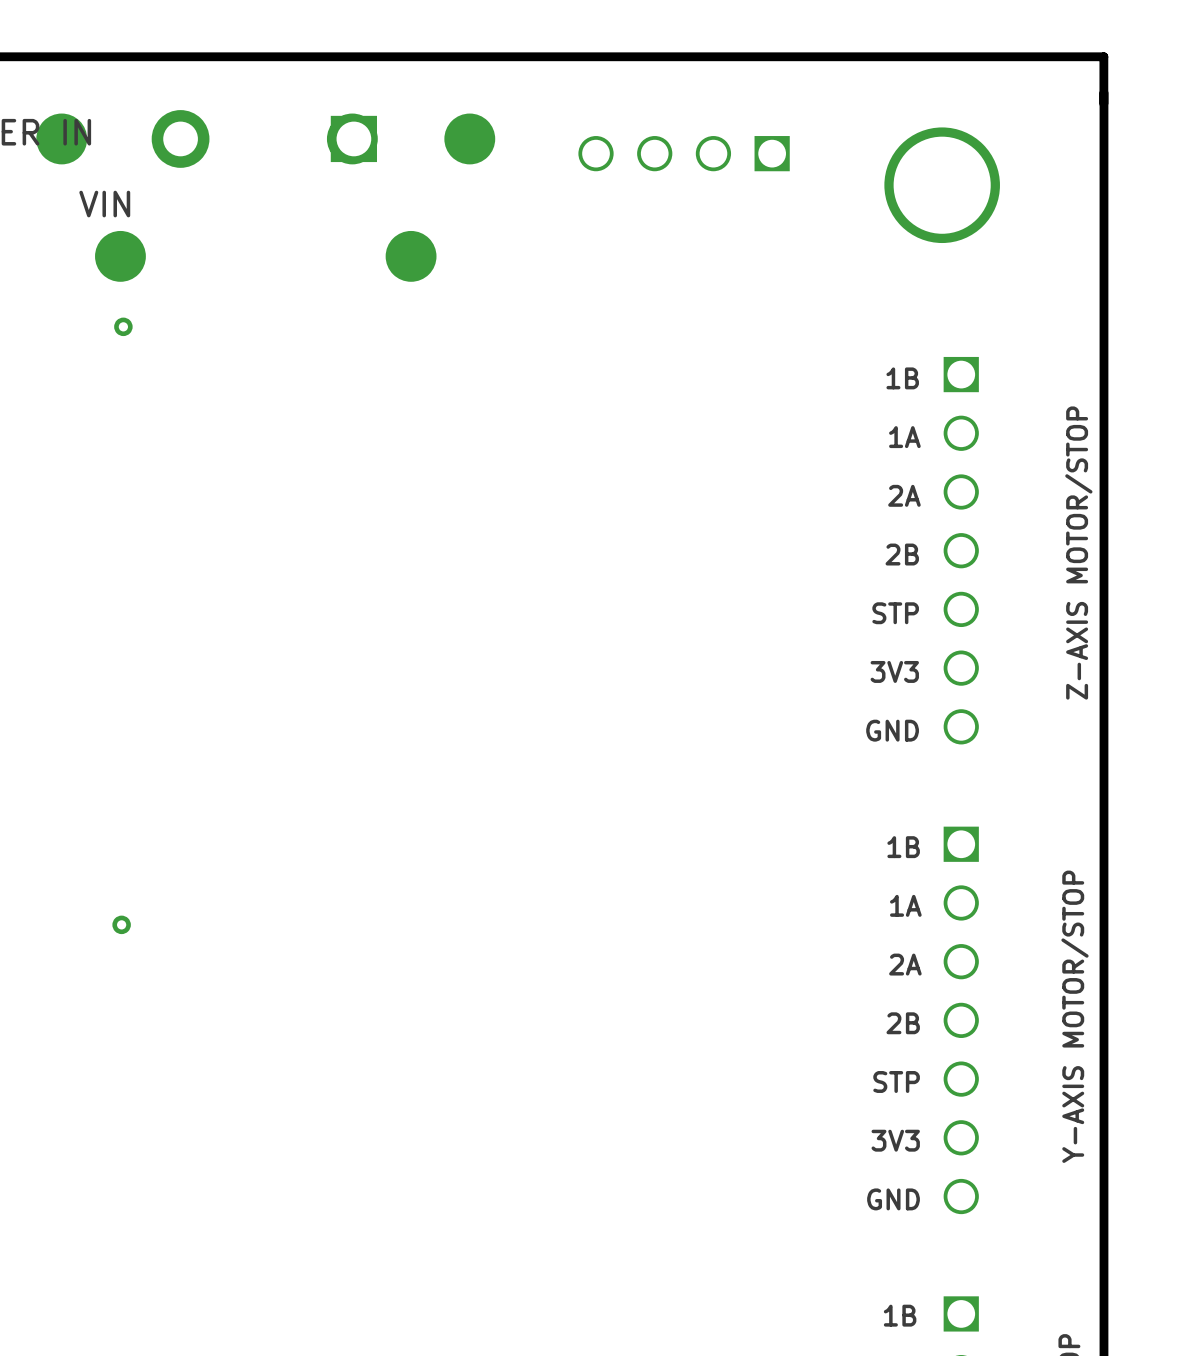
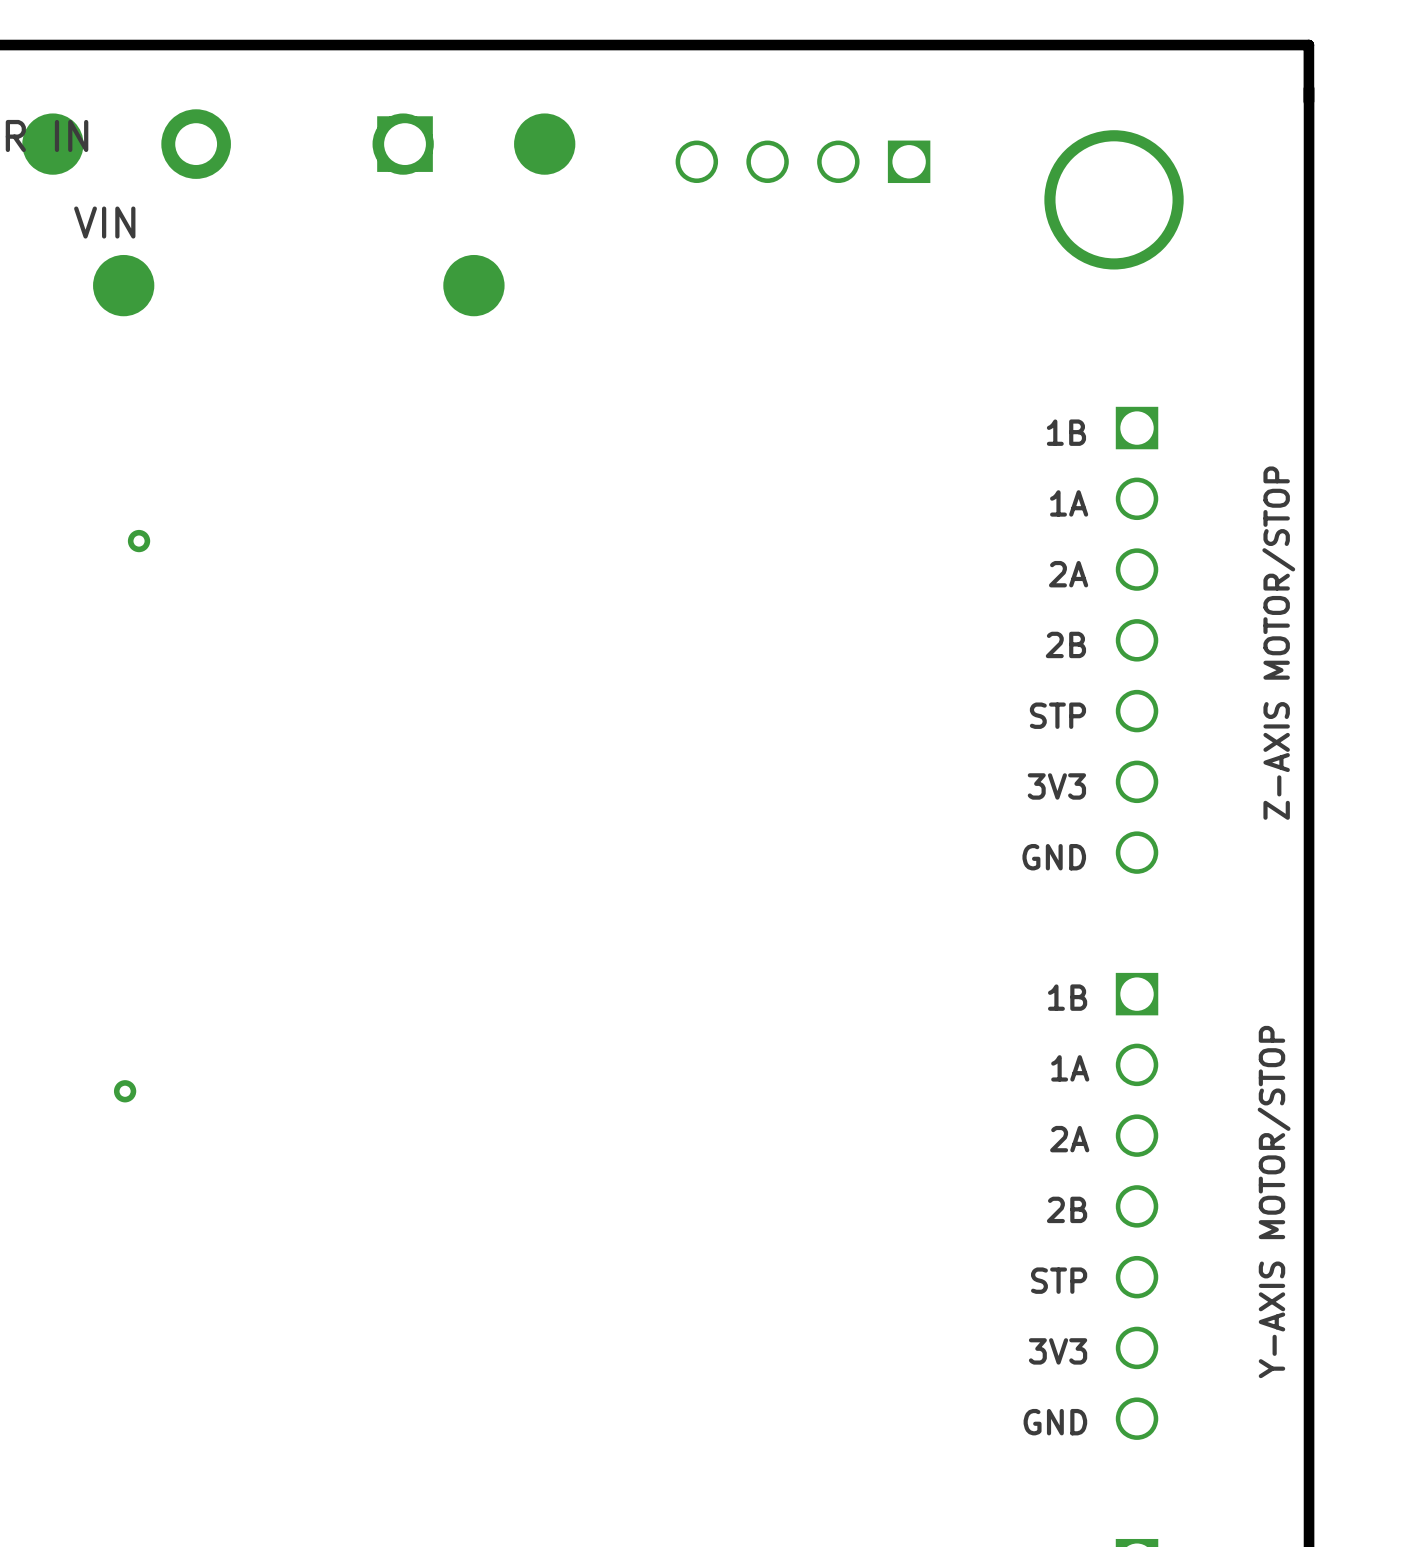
part position: (123, 326) -> (139, 541)

